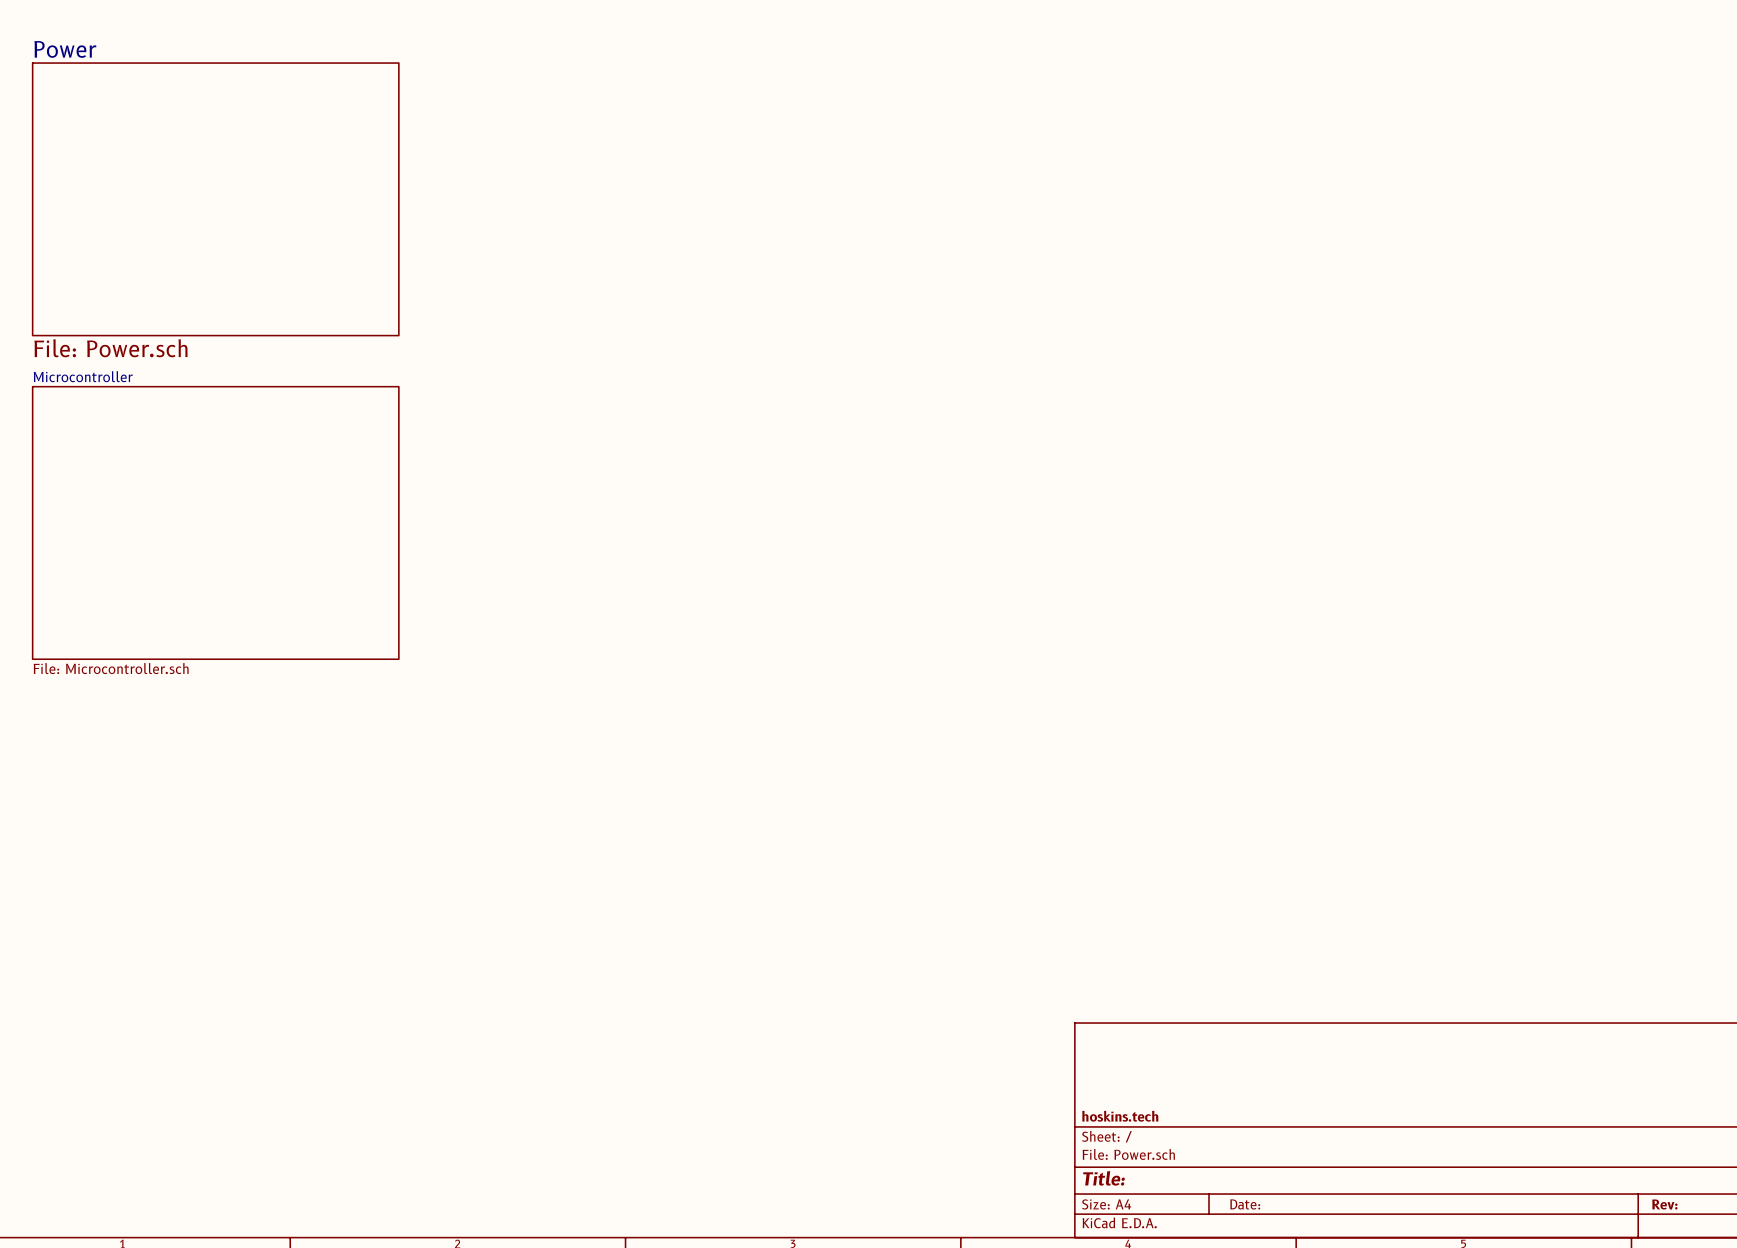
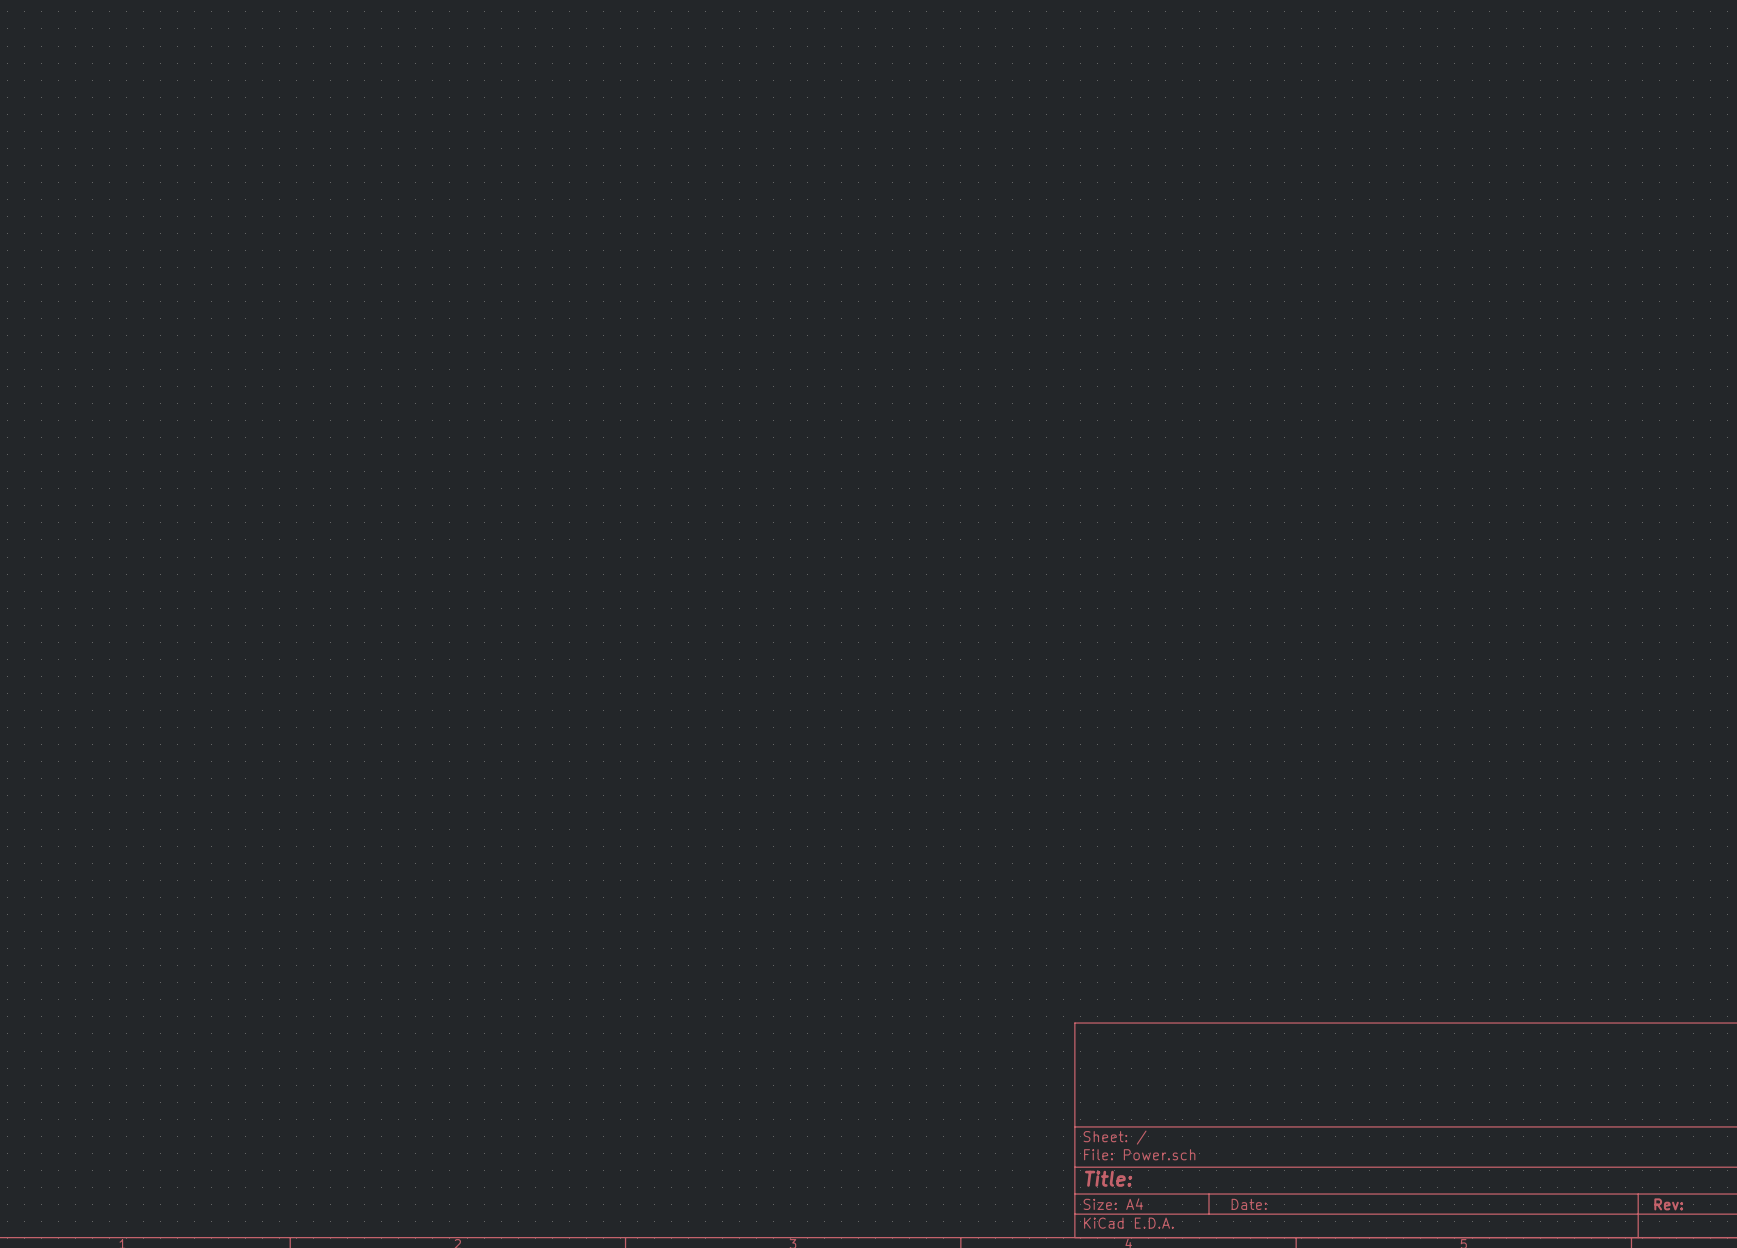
sheet Power: File: Power.sch (215, 199) -> none
sheet Microcontroller: File: Microcontroller.sch (215, 522) -> none
title block: hoskins.tech (1120, 1116) -> none

